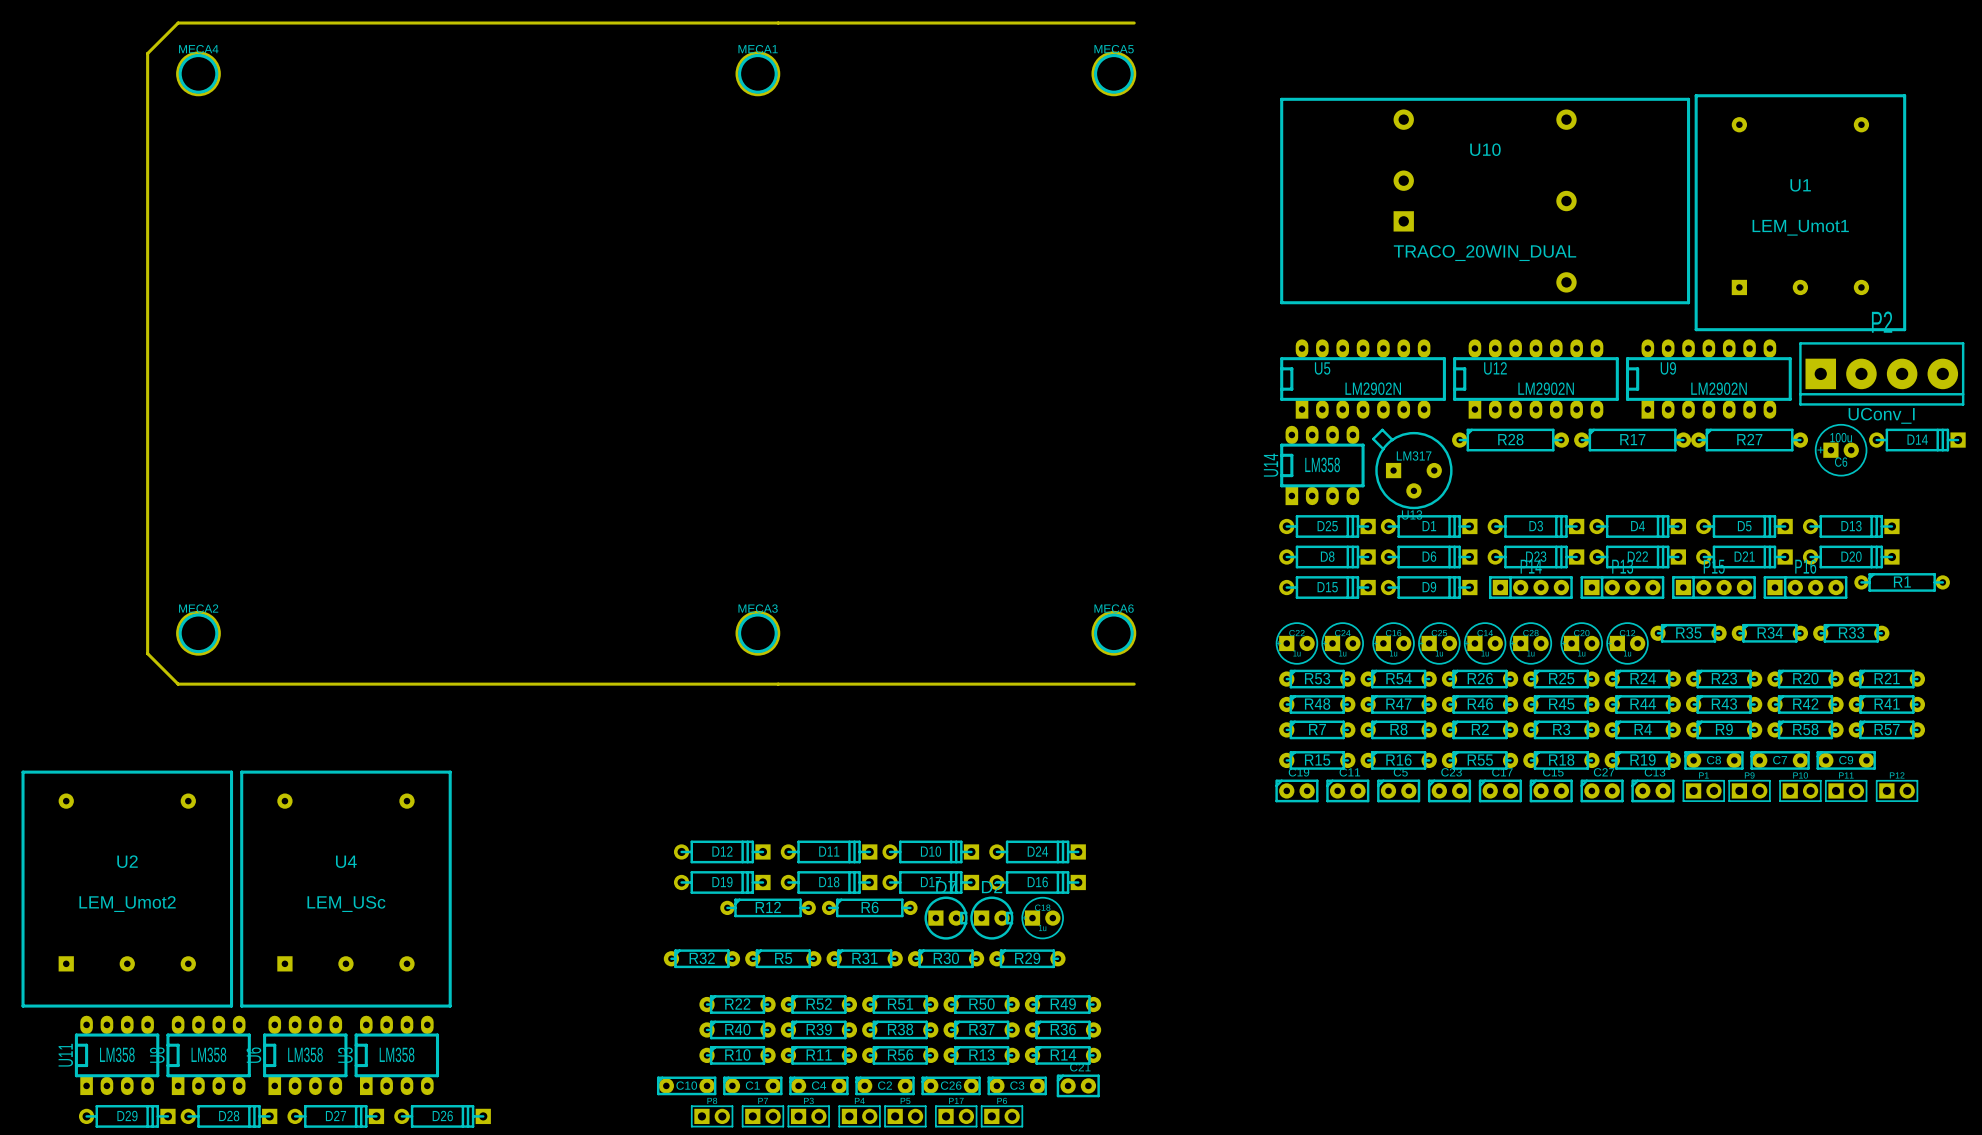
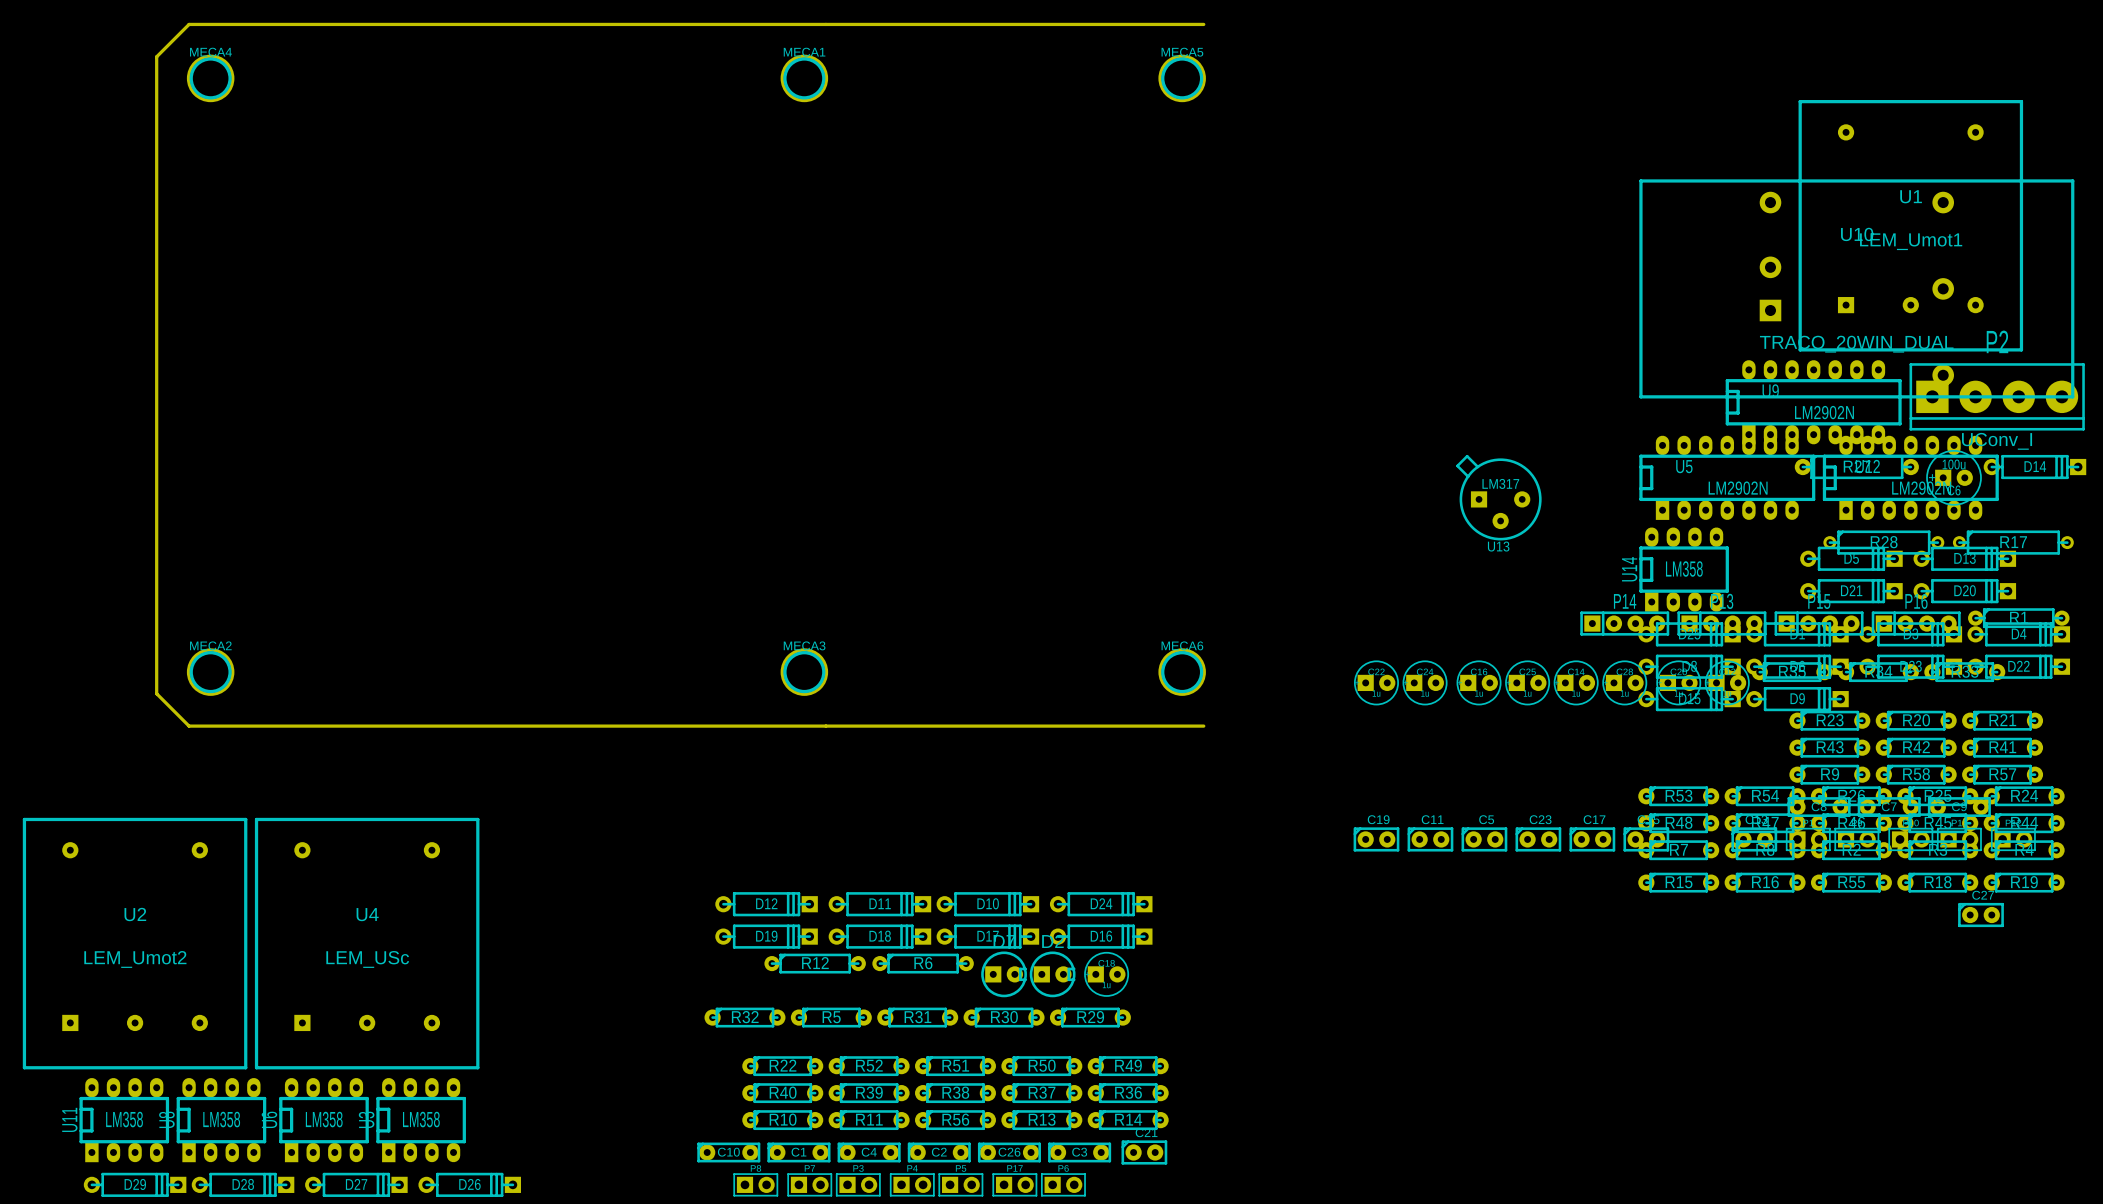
U10 position: (1485, 201) -> (1856, 288)
U5 position: (1363, 379) -> (1727, 477)
U12 position: (1535, 379) -> (1910, 477)
R28 footprint: [1452, 428, 1570, 452] -> [1823, 530, 1945, 555]
R17 footprint: [1574, 428, 1692, 452] -> [1952, 530, 2074, 555]
U14 position: (1322, 465) -> (1684, 569)
D25 position: (1327, 526) -> (1689, 634)
D1 position: (1429, 526) -> (1797, 634)
D3 position: (1535, 526) -> (1910, 634)
D4 position: (1637, 526) -> (2018, 634)
D8 position: (1327, 557) -> (1689, 666)
D6 position: (1429, 557) -> (1797, 666)
D23 position: (1535, 557) -> (1910, 666)
D22 position: (1637, 557) -> (2018, 666)
D15 position: (1327, 587) -> (1689, 699)
D9 position: (1429, 587) -> (1797, 699)
R53 position: (1317, 679) -> (1678, 796)
R54 position: (1398, 679) -> (1765, 796)
R26 position: (1480, 679) -> (1851, 796)
R25 position: (1561, 679) -> (1937, 796)
R24 position: (1642, 679) -> (2024, 796)
R48 position: (1317, 704) -> (1678, 823)
R47 position: (1398, 704) -> (1765, 823)
R46 position: (1480, 704) -> (1851, 823)
R45 position: (1561, 704) -> (1937, 823)
R44 position: (1642, 704) -> (2024, 823)
R7 position: (1317, 729) -> (1678, 850)
R8 position: (1398, 729) -> (1765, 850)
R2 position: (1480, 729) -> (1851, 850)
R3 position: (1561, 729) -> (1937, 850)
R4 position: (1642, 729) -> (2024, 850)
R15 position: (1317, 760) -> (1678, 882)
R16 position: (1398, 760) -> (1765, 882)
R55 position: (1480, 760) -> (1851, 882)
R18 position: (1561, 760) -> (1937, 882)
R19 position: (1642, 760) -> (2024, 882)
C27 position: (1602, 790) -> (1980, 915)

